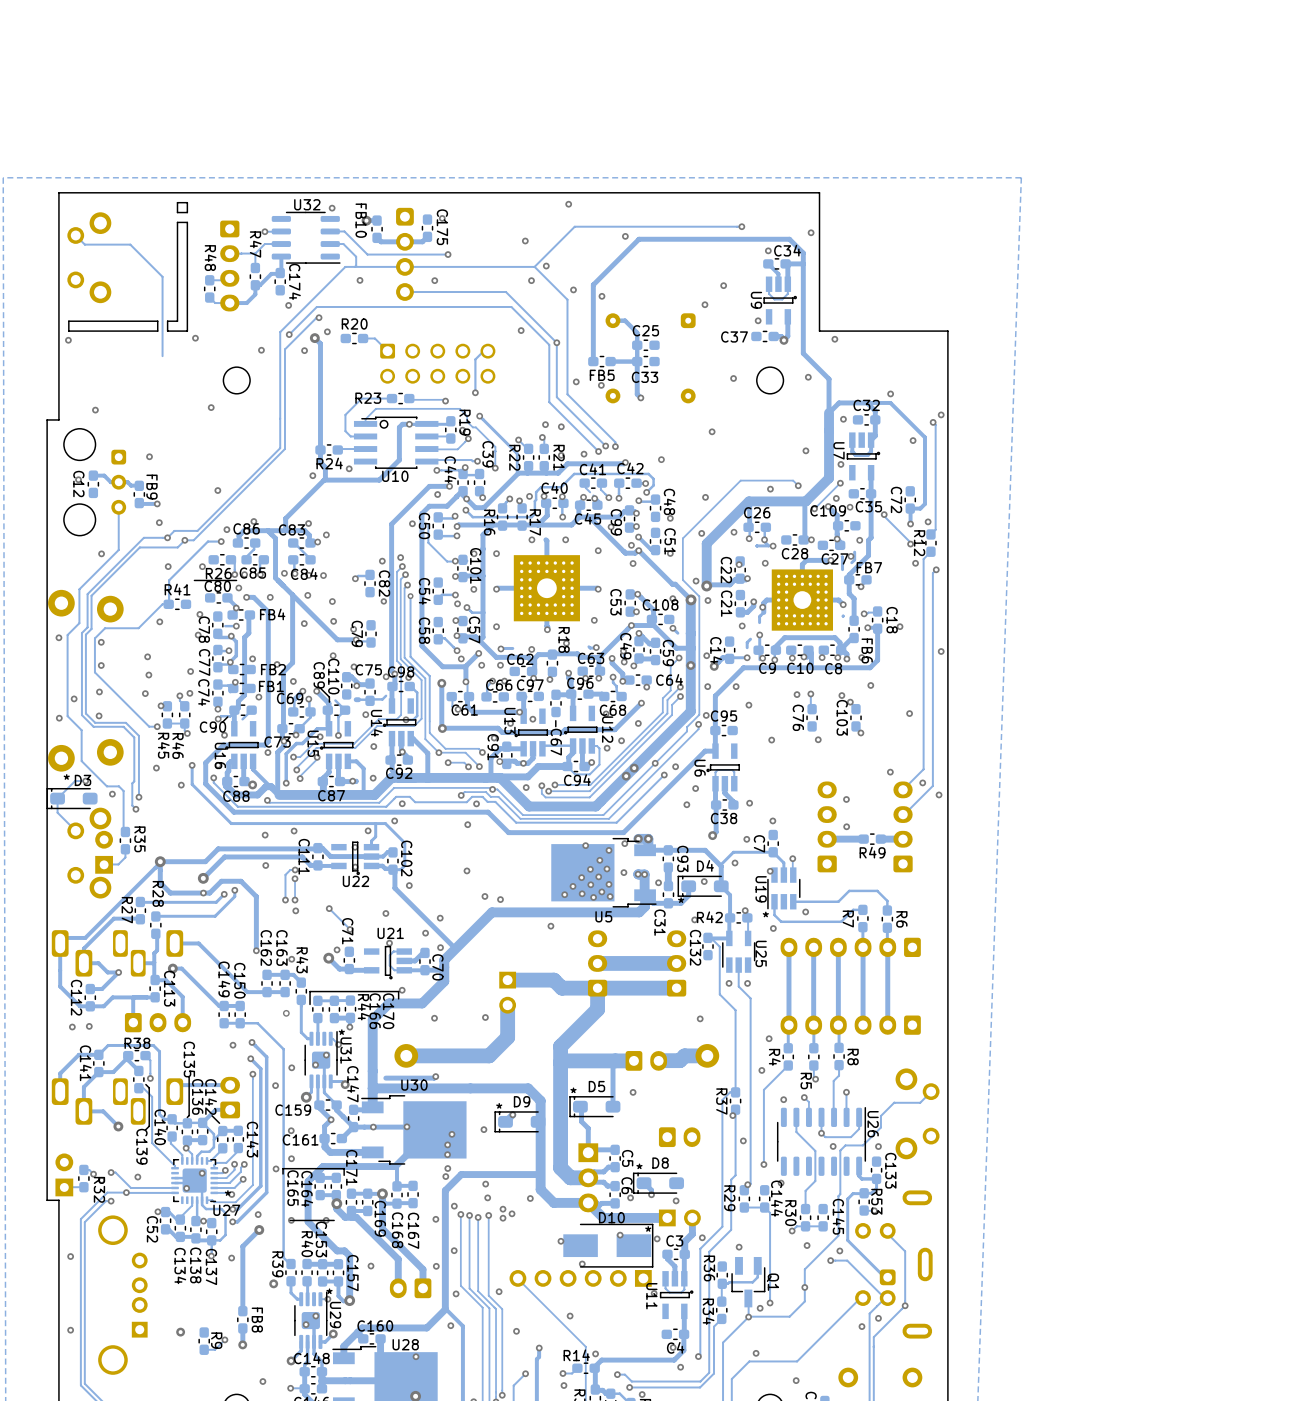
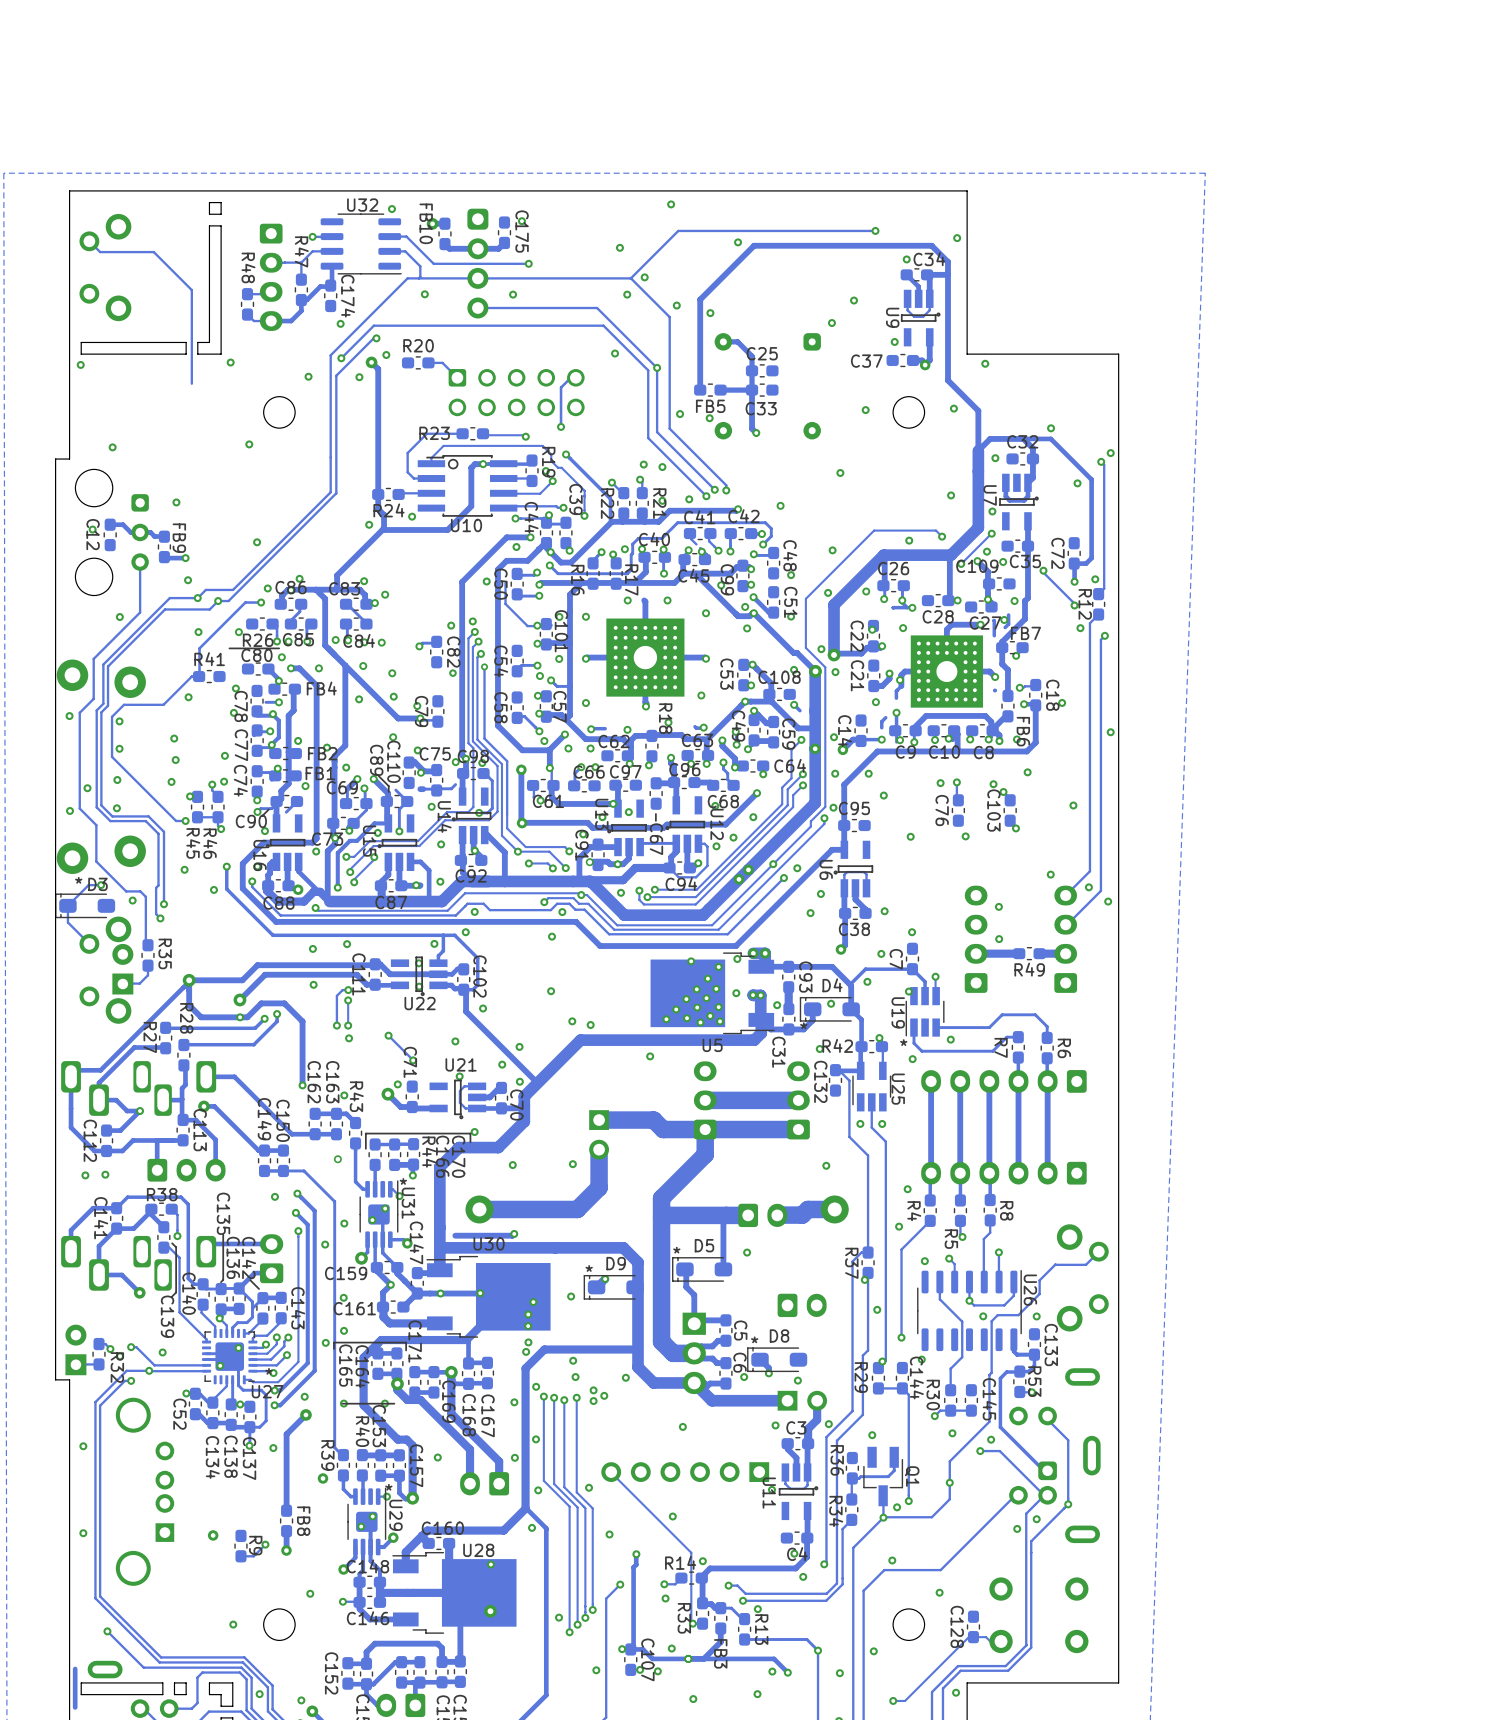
text: * (648, 1228) -> none
via: (620, 1235) -> none
via: none -> (682, 1426)
via: (560, 1241) -> none
D10: (608, 1245) -> none
via: (582, 1263) -> none

